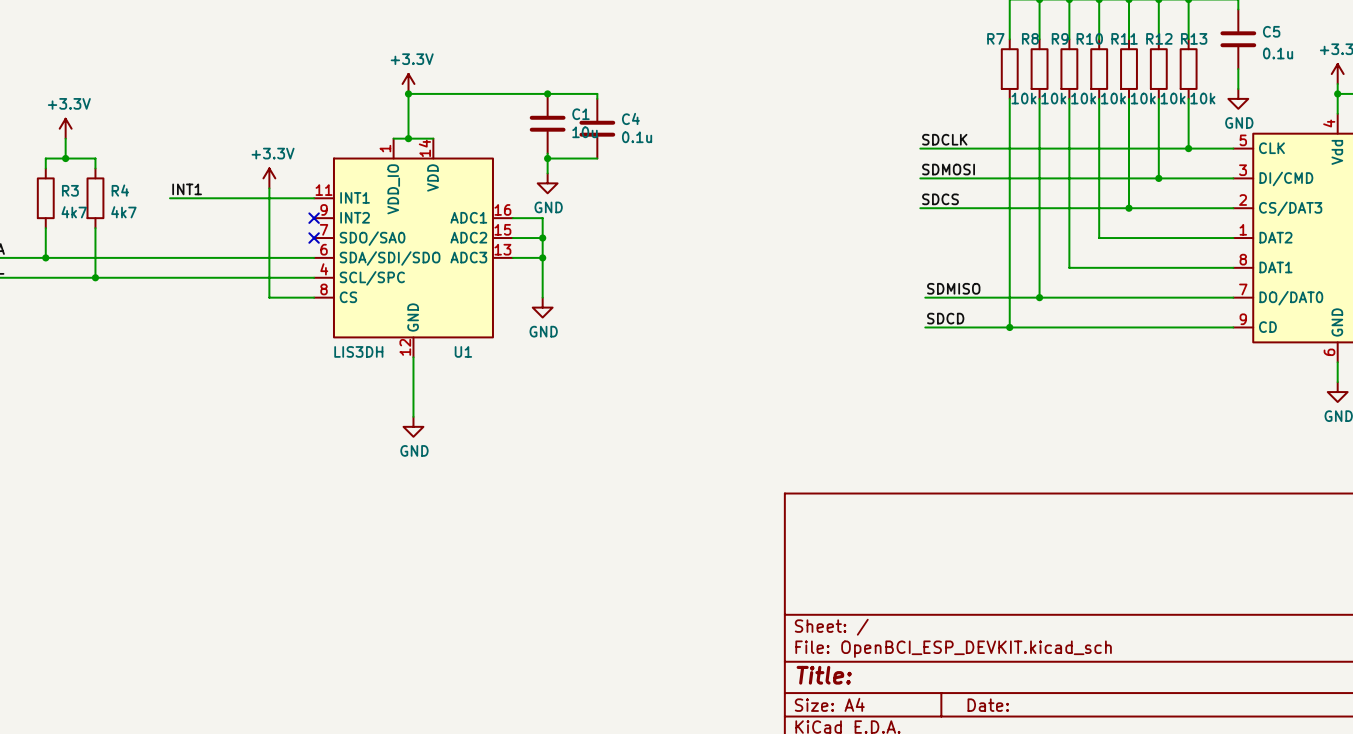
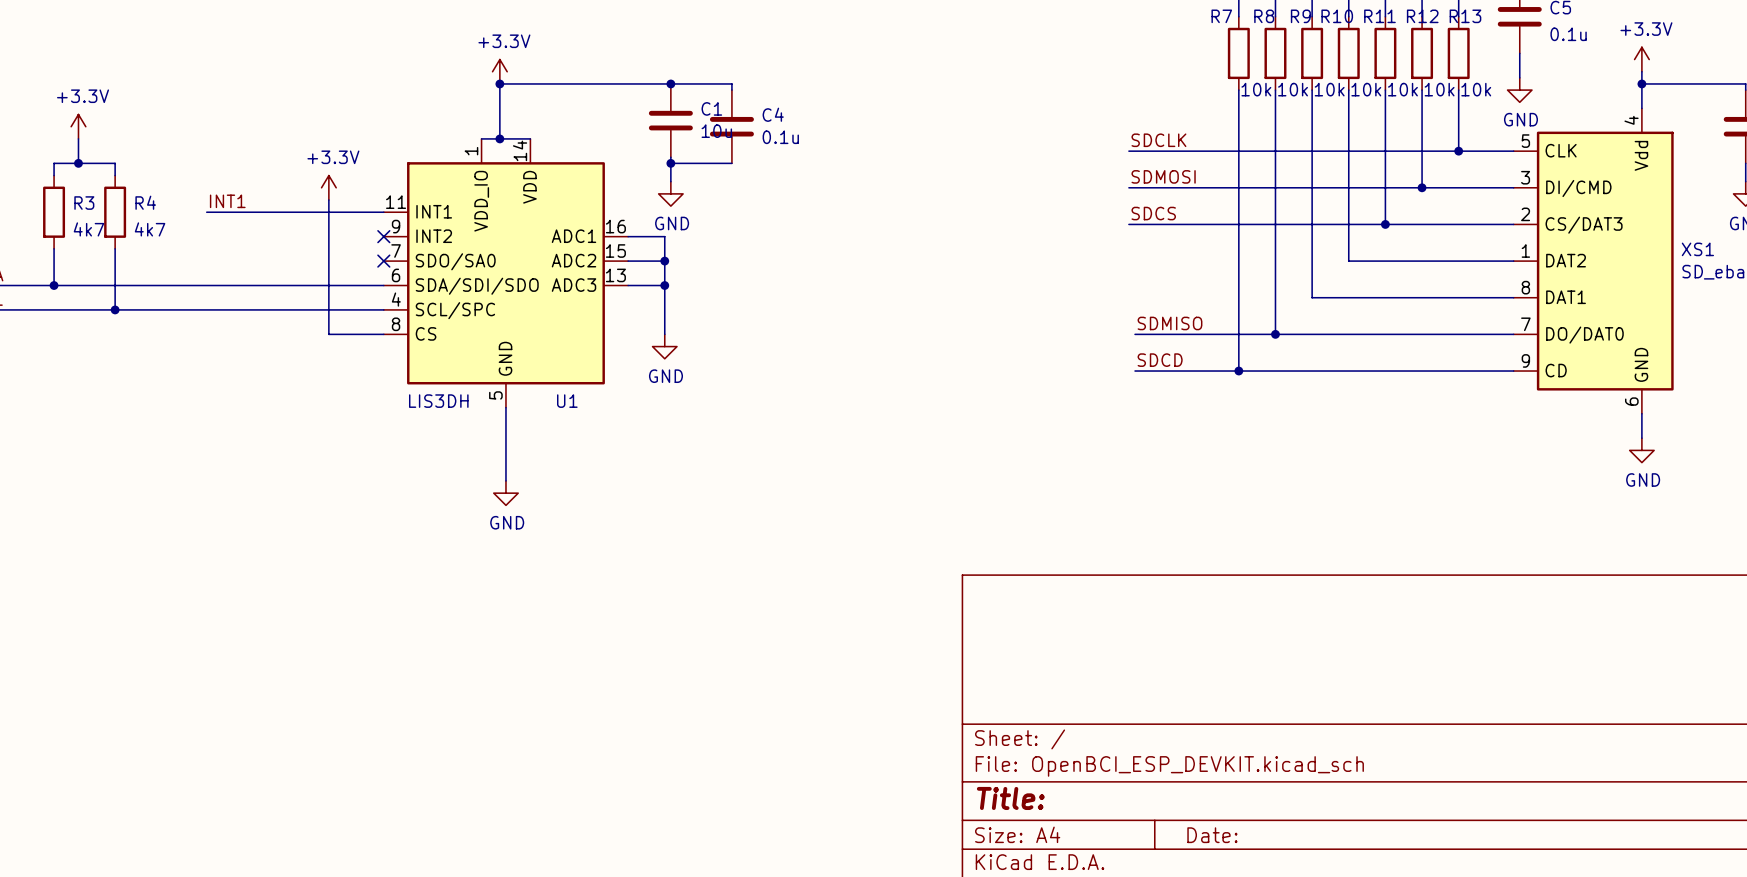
U1 pin number: 12 (405, 347) -> 5 (495, 395)

